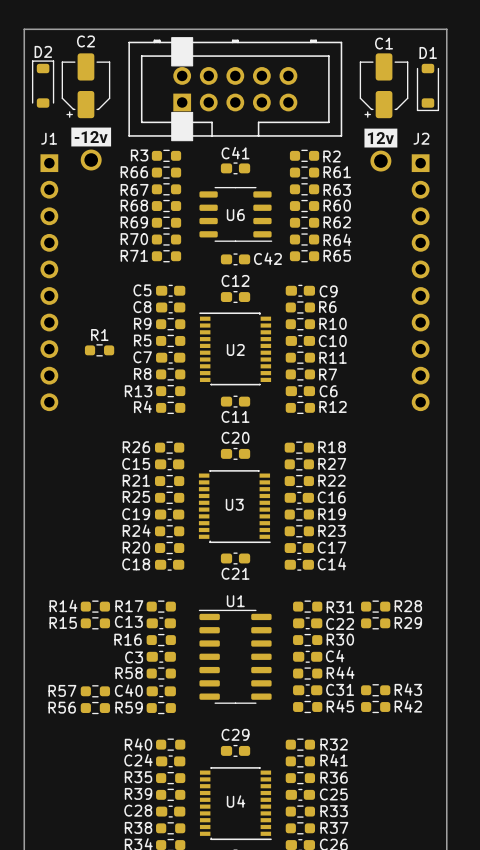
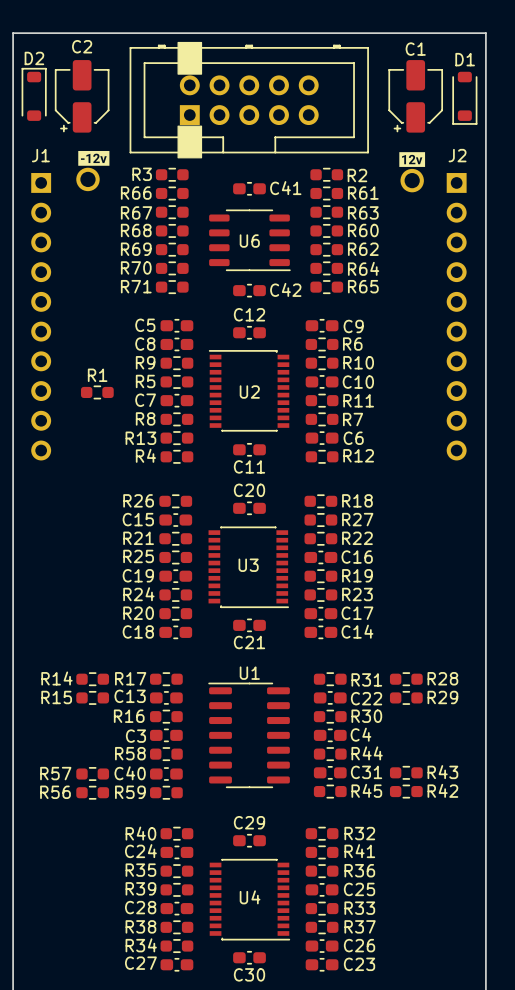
drawing shape: [71, 127, 112, 147] -> [78, 150, 110, 166]
drawing shape: [364, 128, 398, 148] -> [399, 152, 426, 167]
C41 name position: C41 (235, 153) -> C41 (285, 188)

